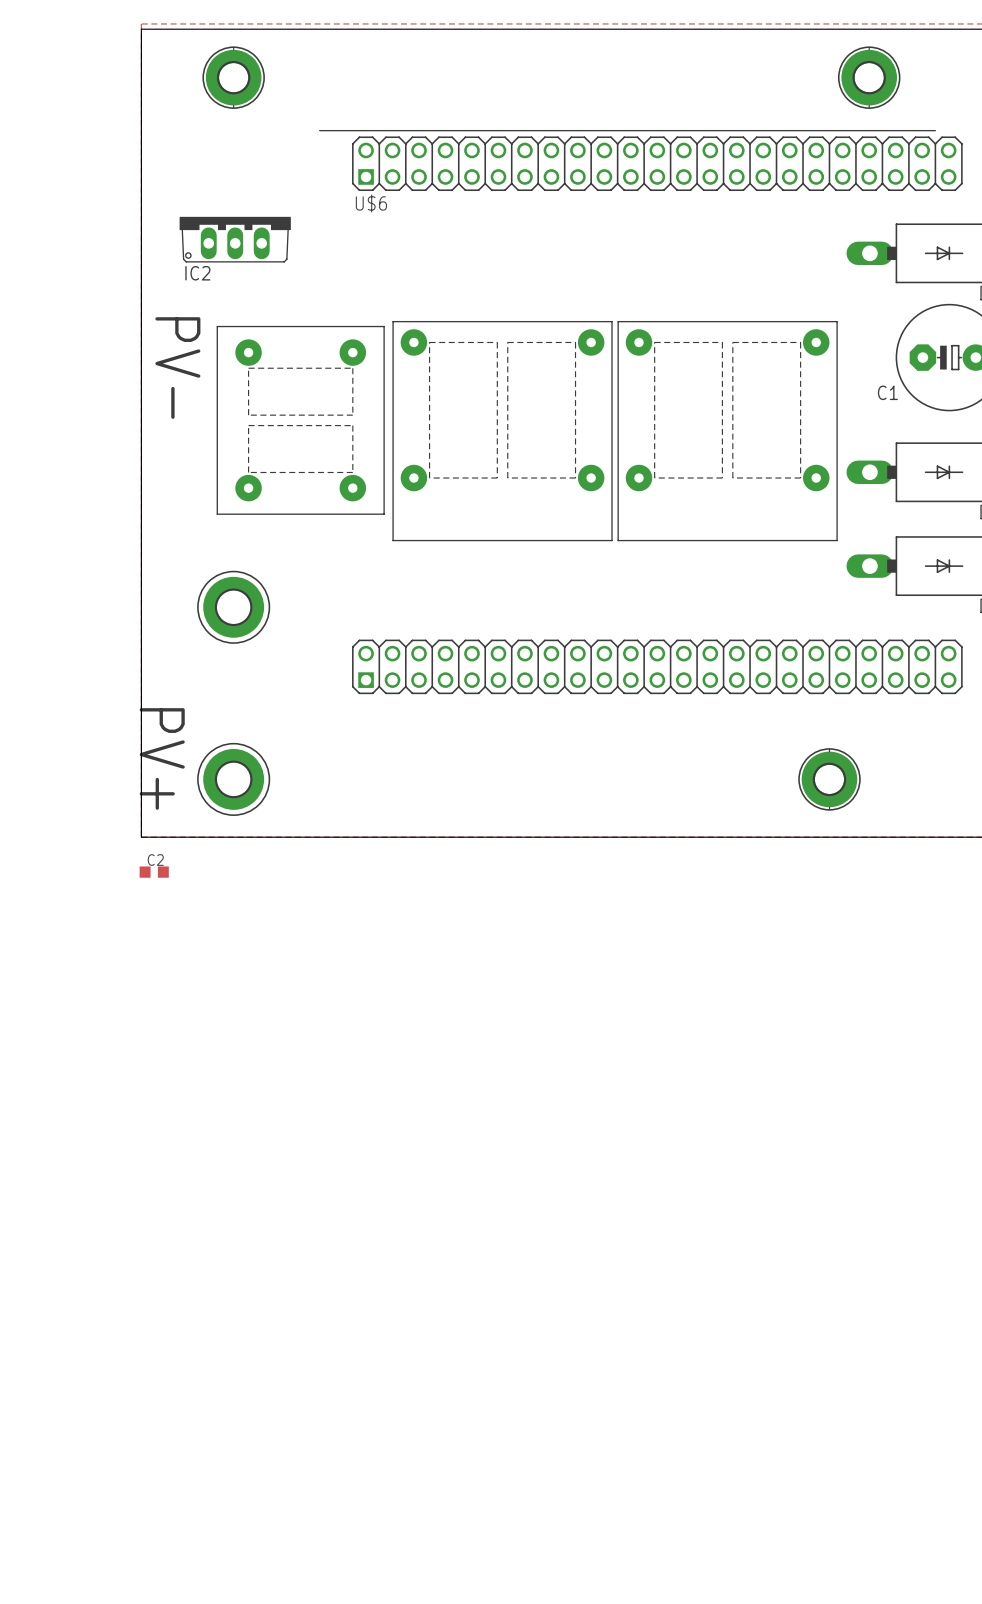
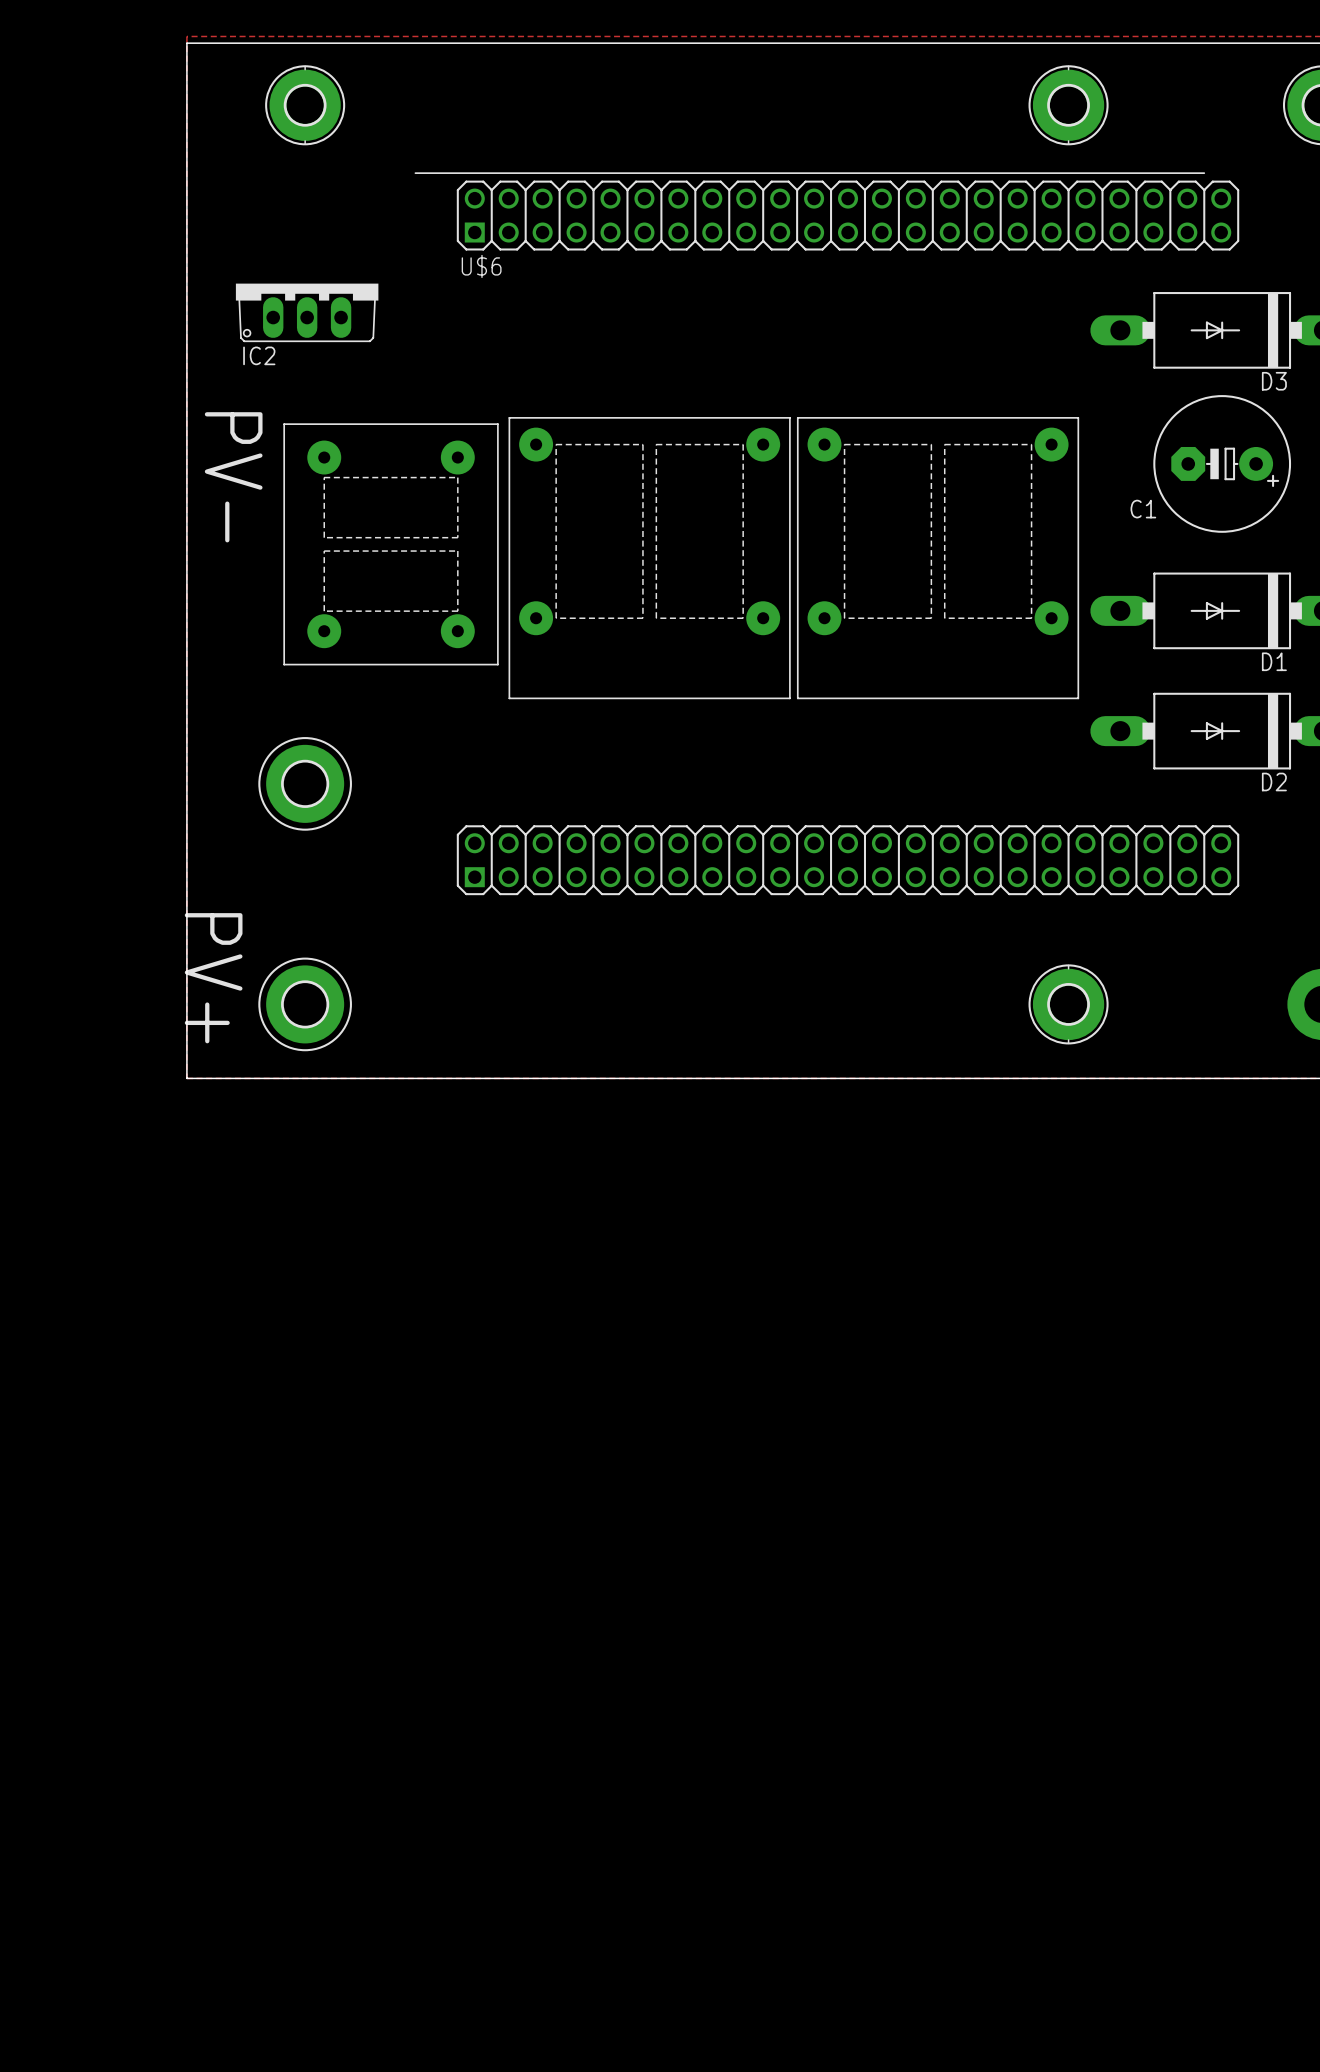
part position: (869, 77) -> (1068, 105)
C2: (154, 872) -> none

